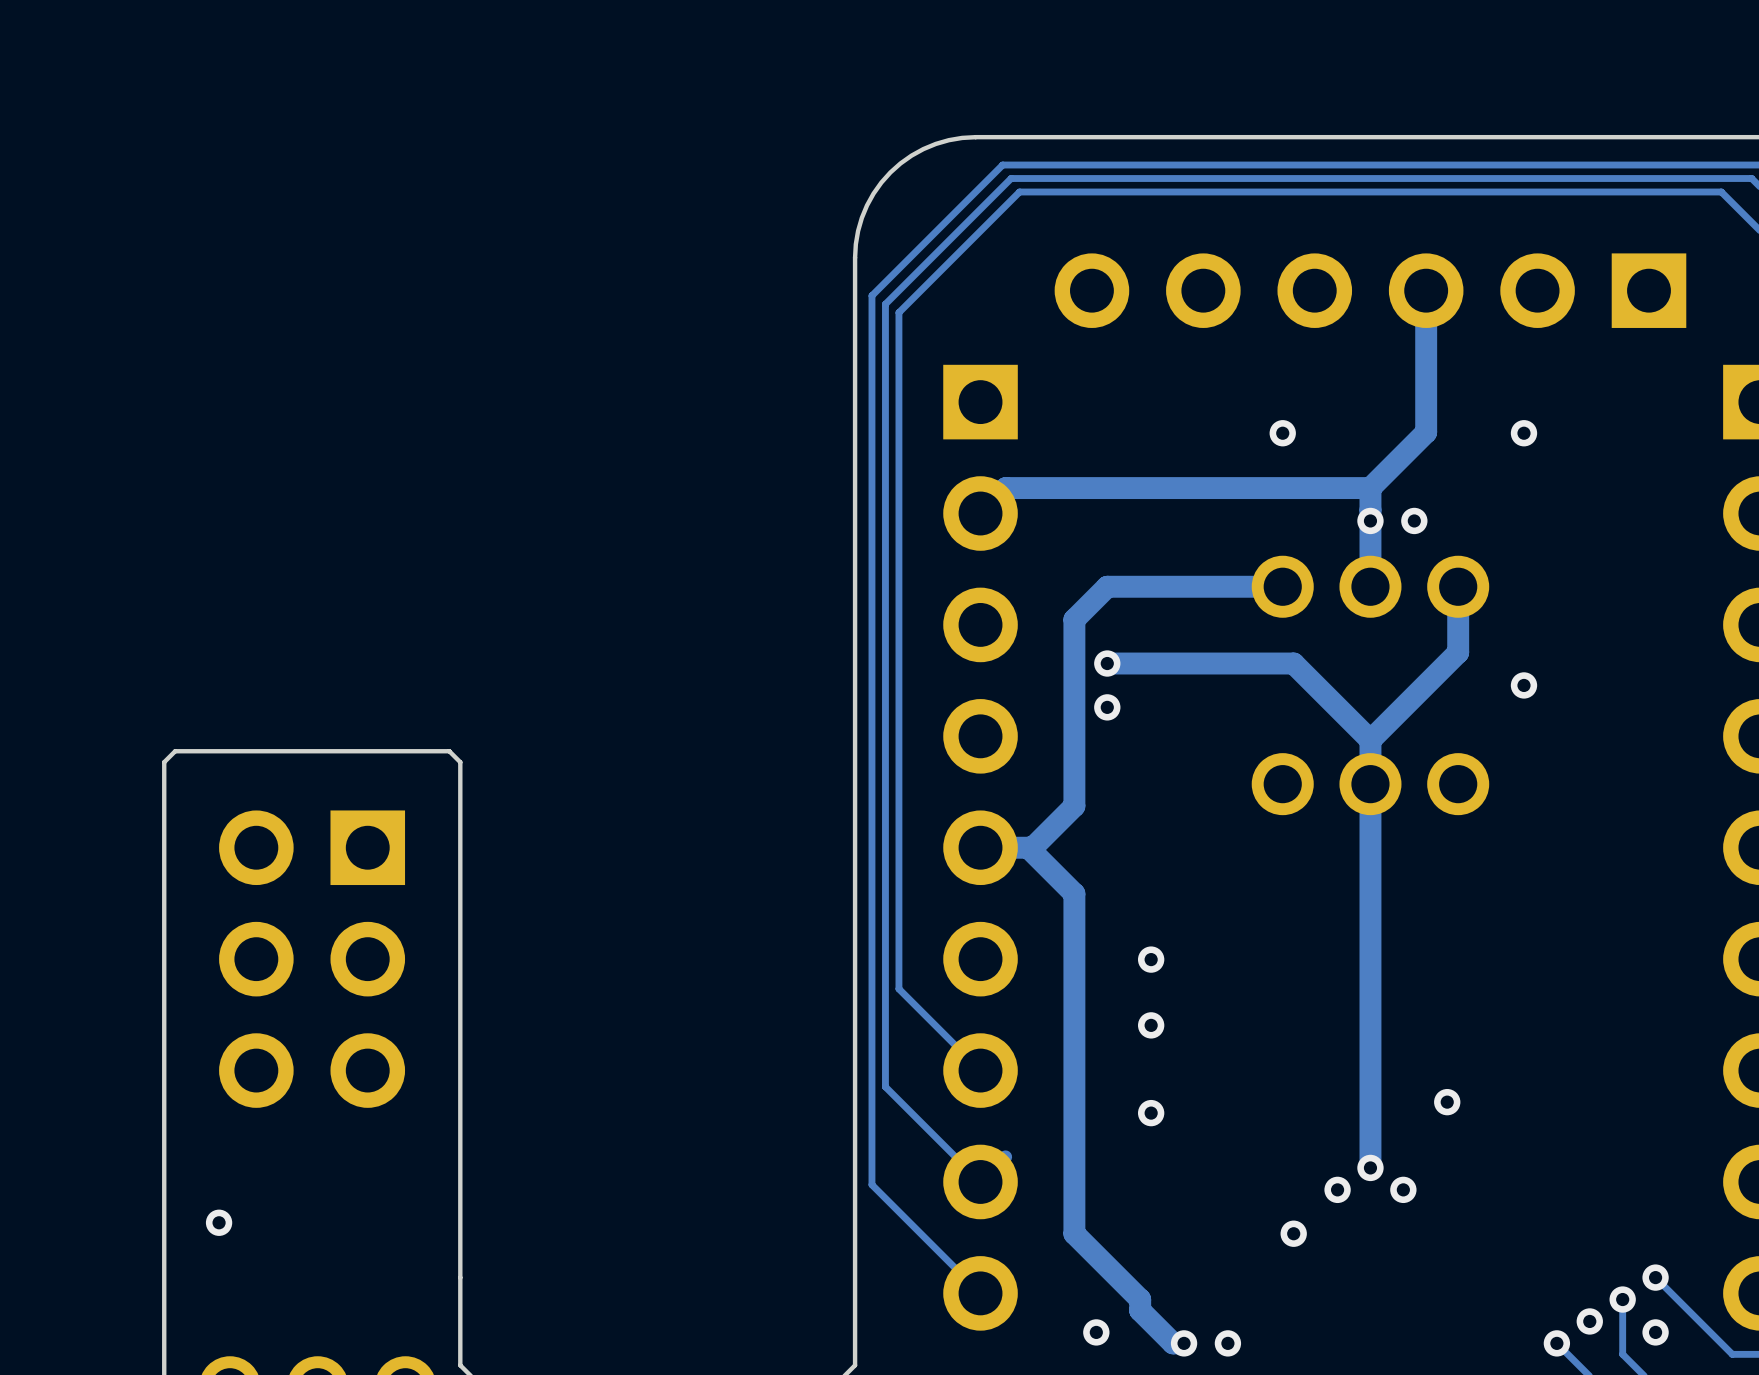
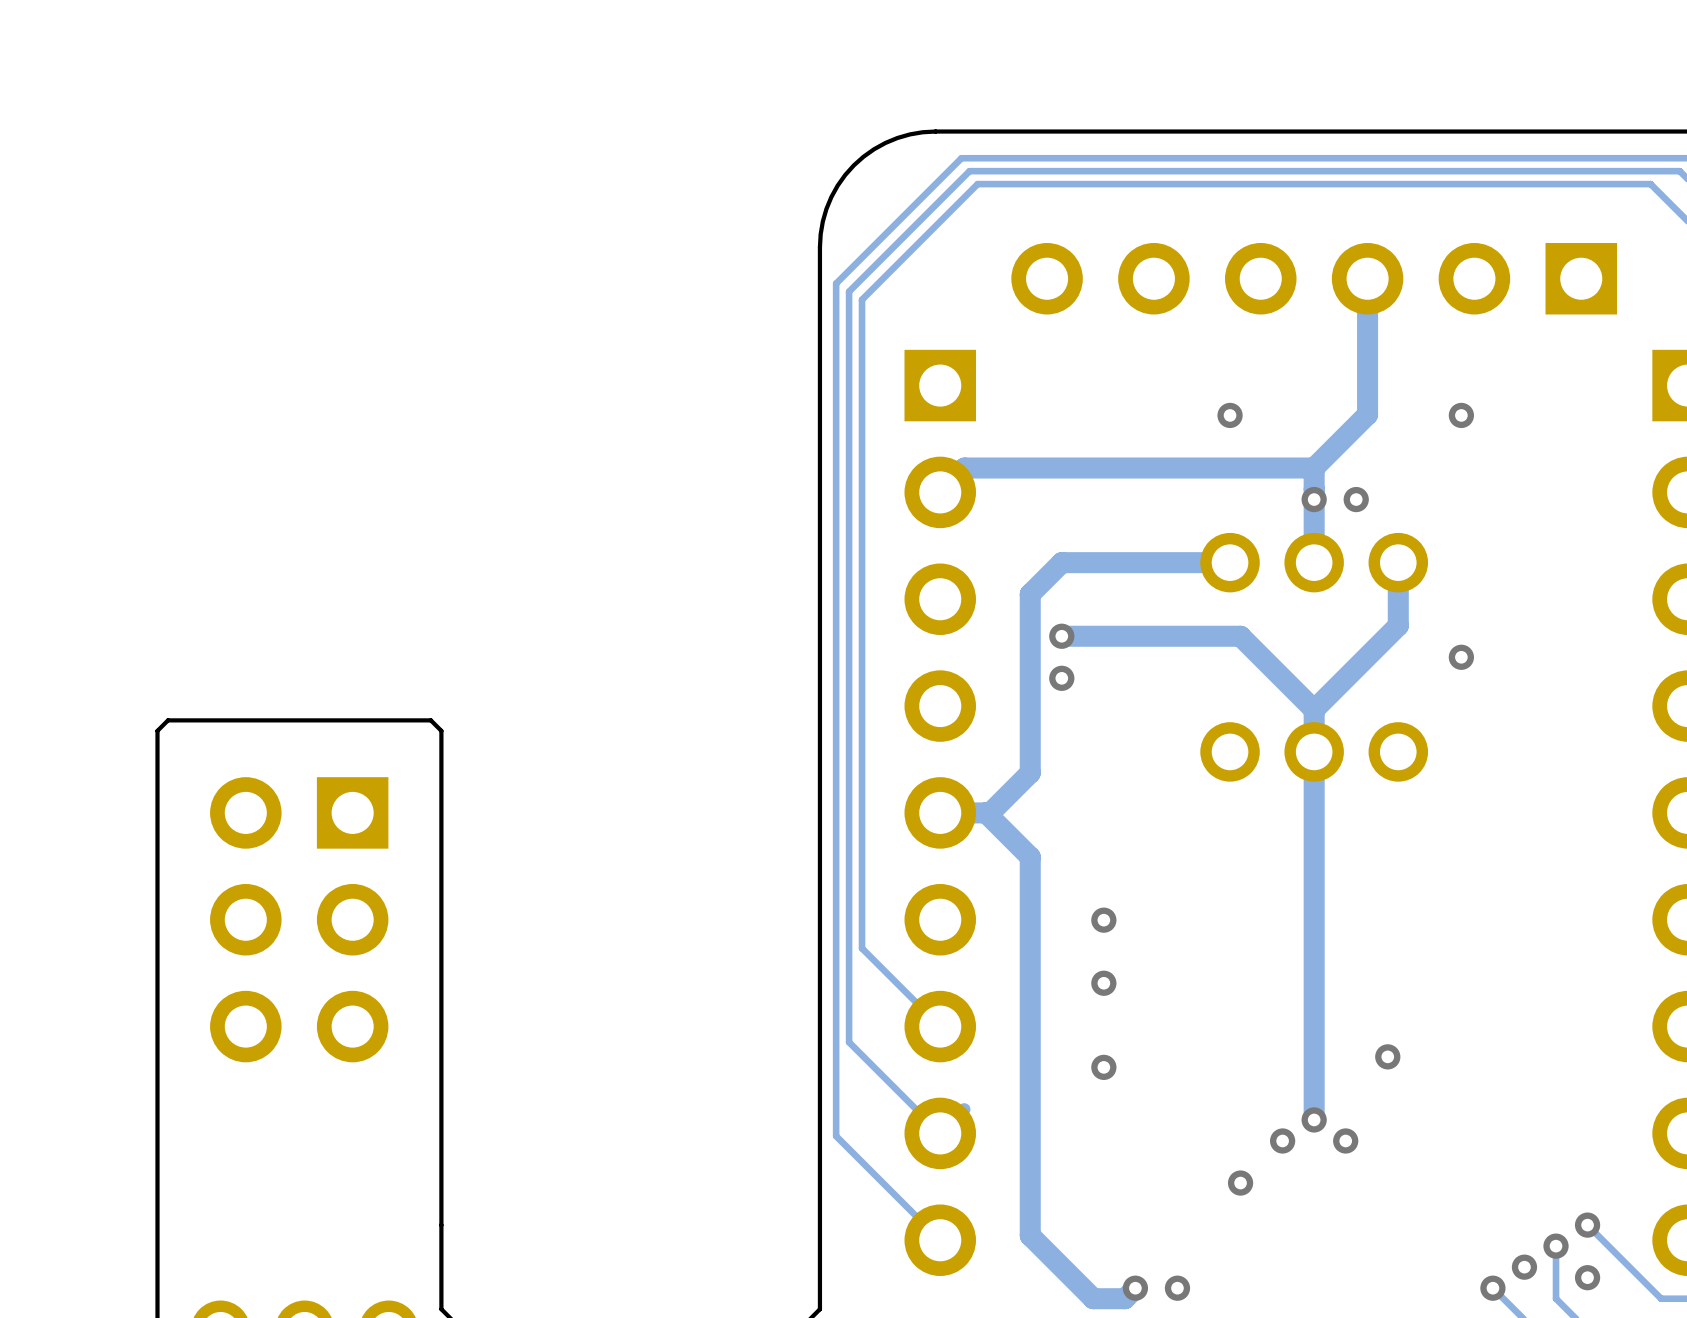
via: (219, 1222) -> none
track: (1074, 1233) (1140, 1299) (1140, 1310) (1173, 1343) (1184, 1343) -> (1030, 1183) (1030, 1235) (1093, 1298) (1124, 1298) (1135, 1288)
via: (1096, 1332) -> none

